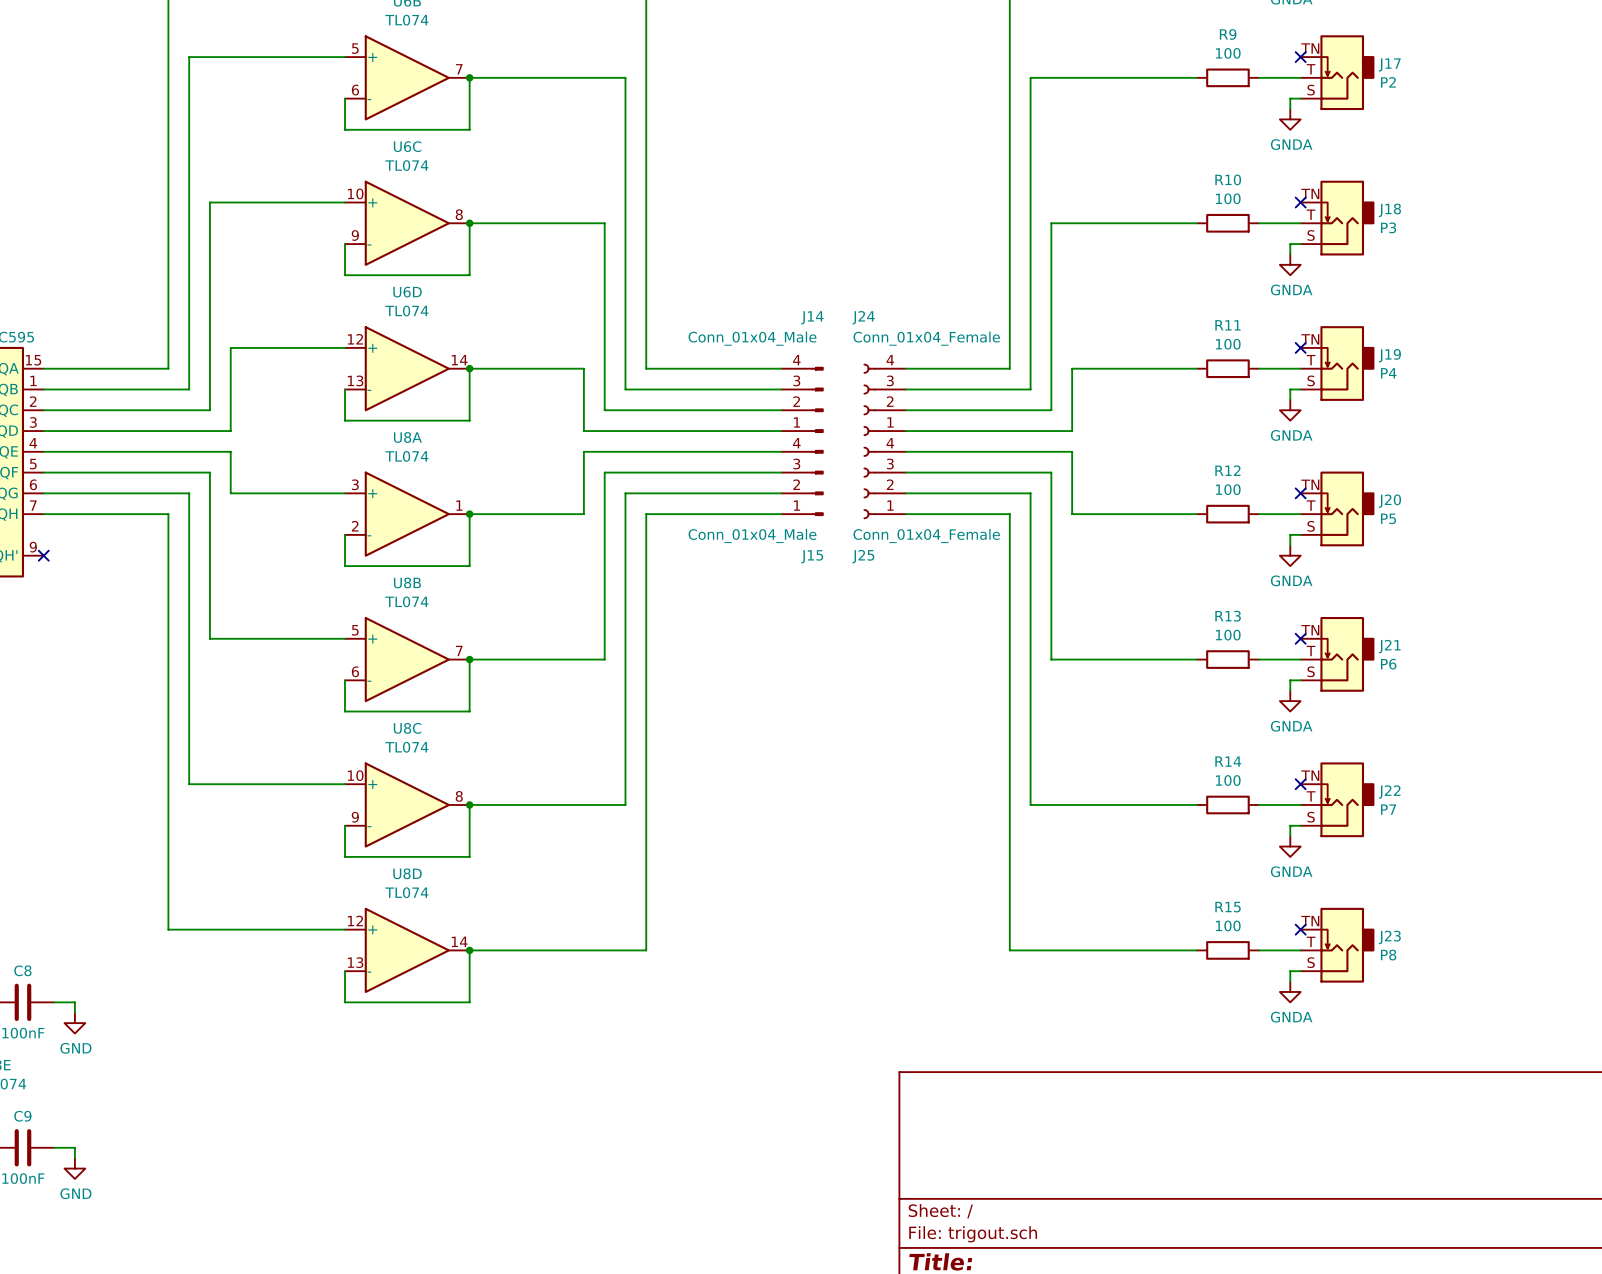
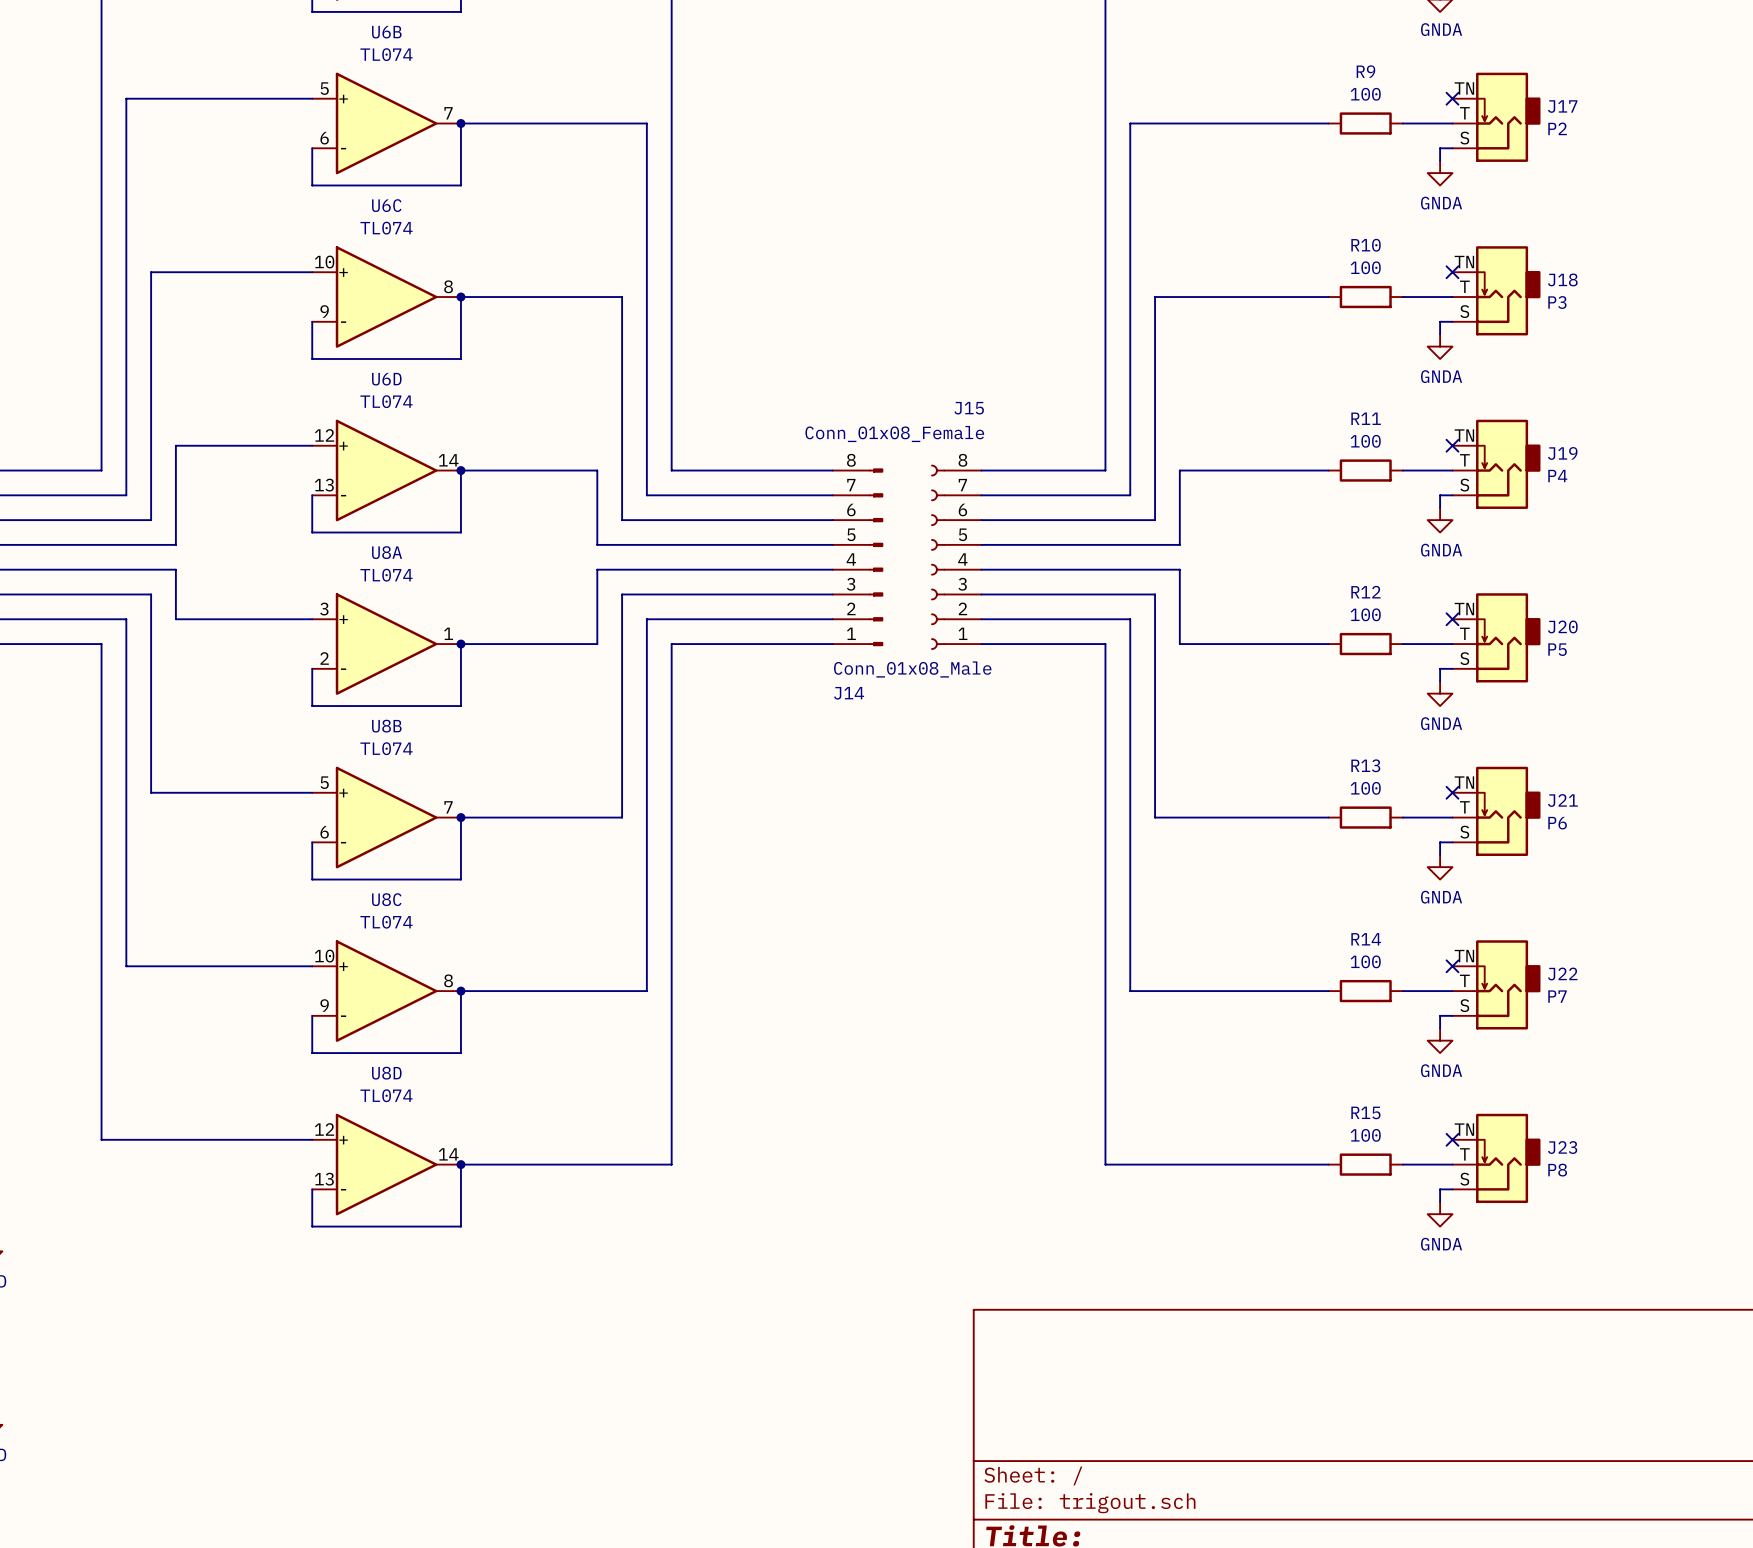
J14 name position: J14 (812, 317) -> J14 (849, 693)
J14 value: Conn_01x04_Male (752, 338) -> Conn_01x08_Male (912, 669)
J14 symbol: [781, 367, 824, 433] -> [832, 468, 884, 647]
J24: Conn_01x04_Female (884, 399) -> none
J15 symbol: [781, 450, 824, 516] -> [931, 464, 982, 650]
J25: Conn_01x04_Female (884, 482) -> none
J15 value: Conn_01x04_Male (752, 535) -> Conn_01x08_Female (894, 434)
J15 name position: J15 (812, 556) -> J15 (969, 408)

